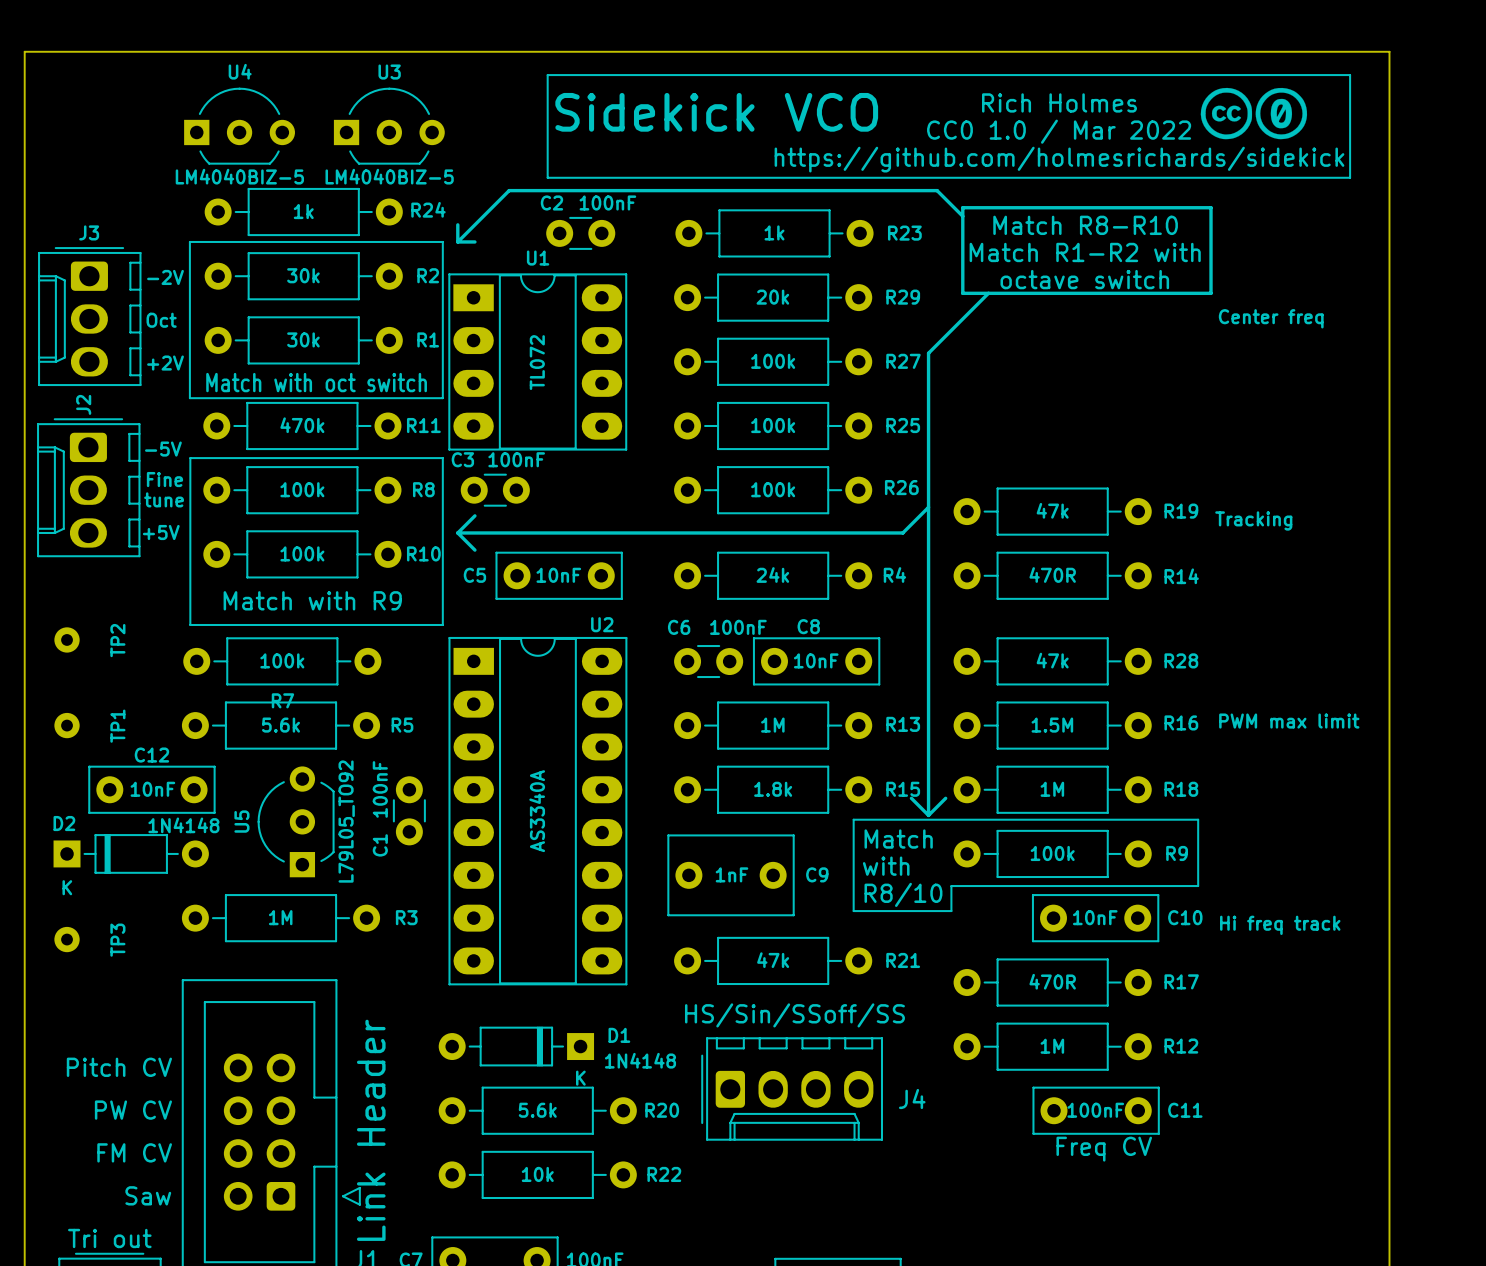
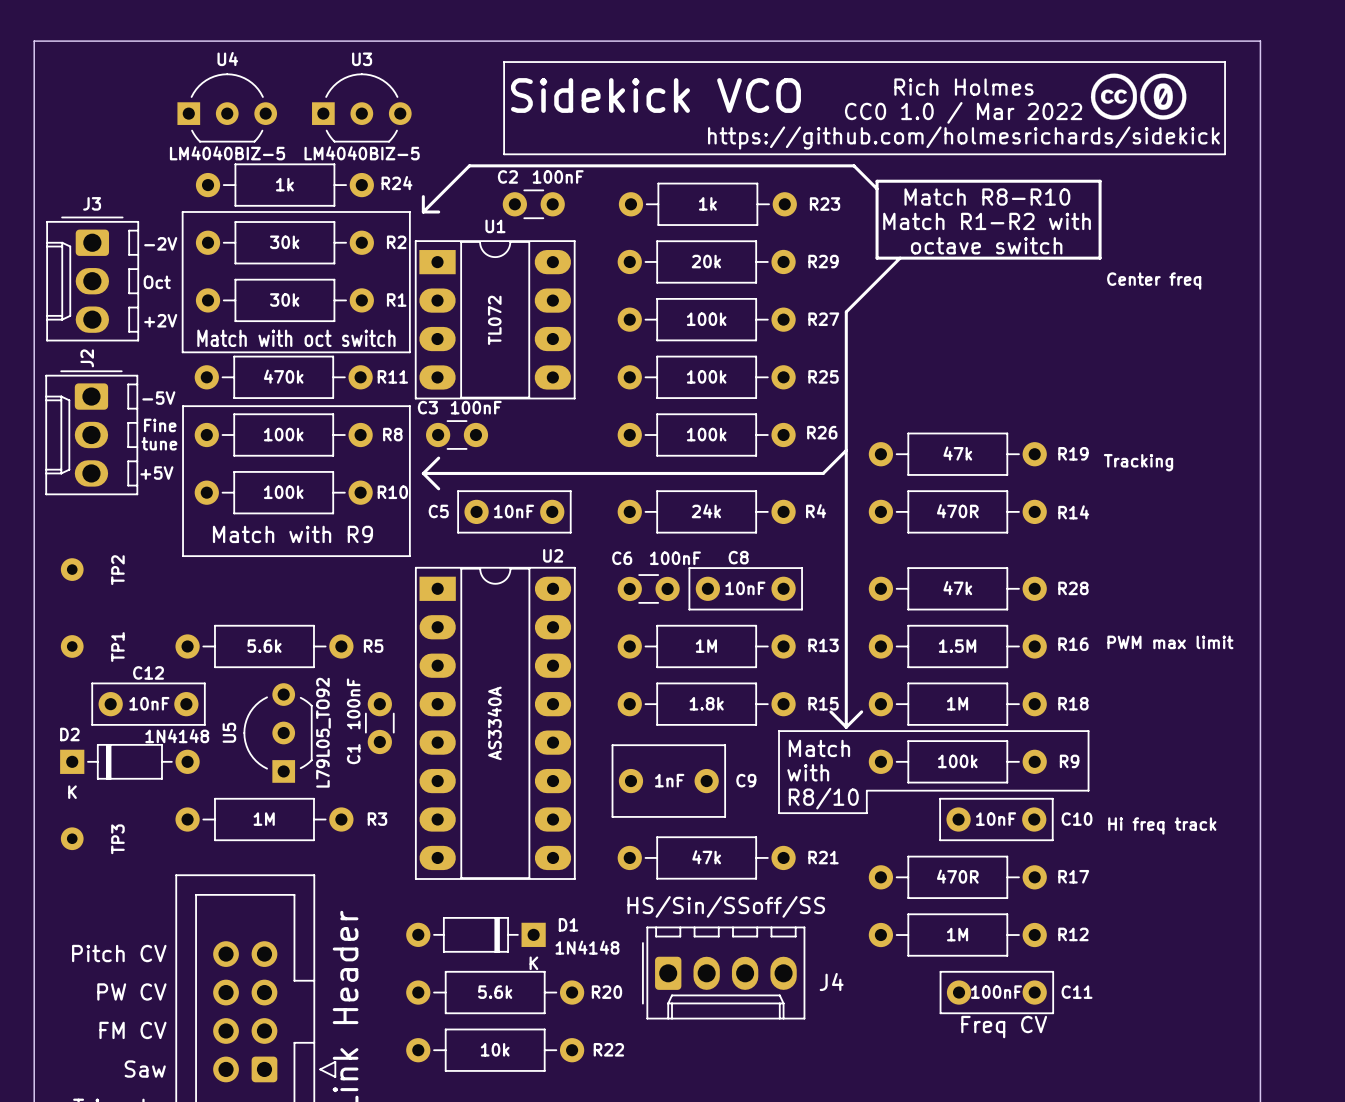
R7: 100k (282, 661) -> none

